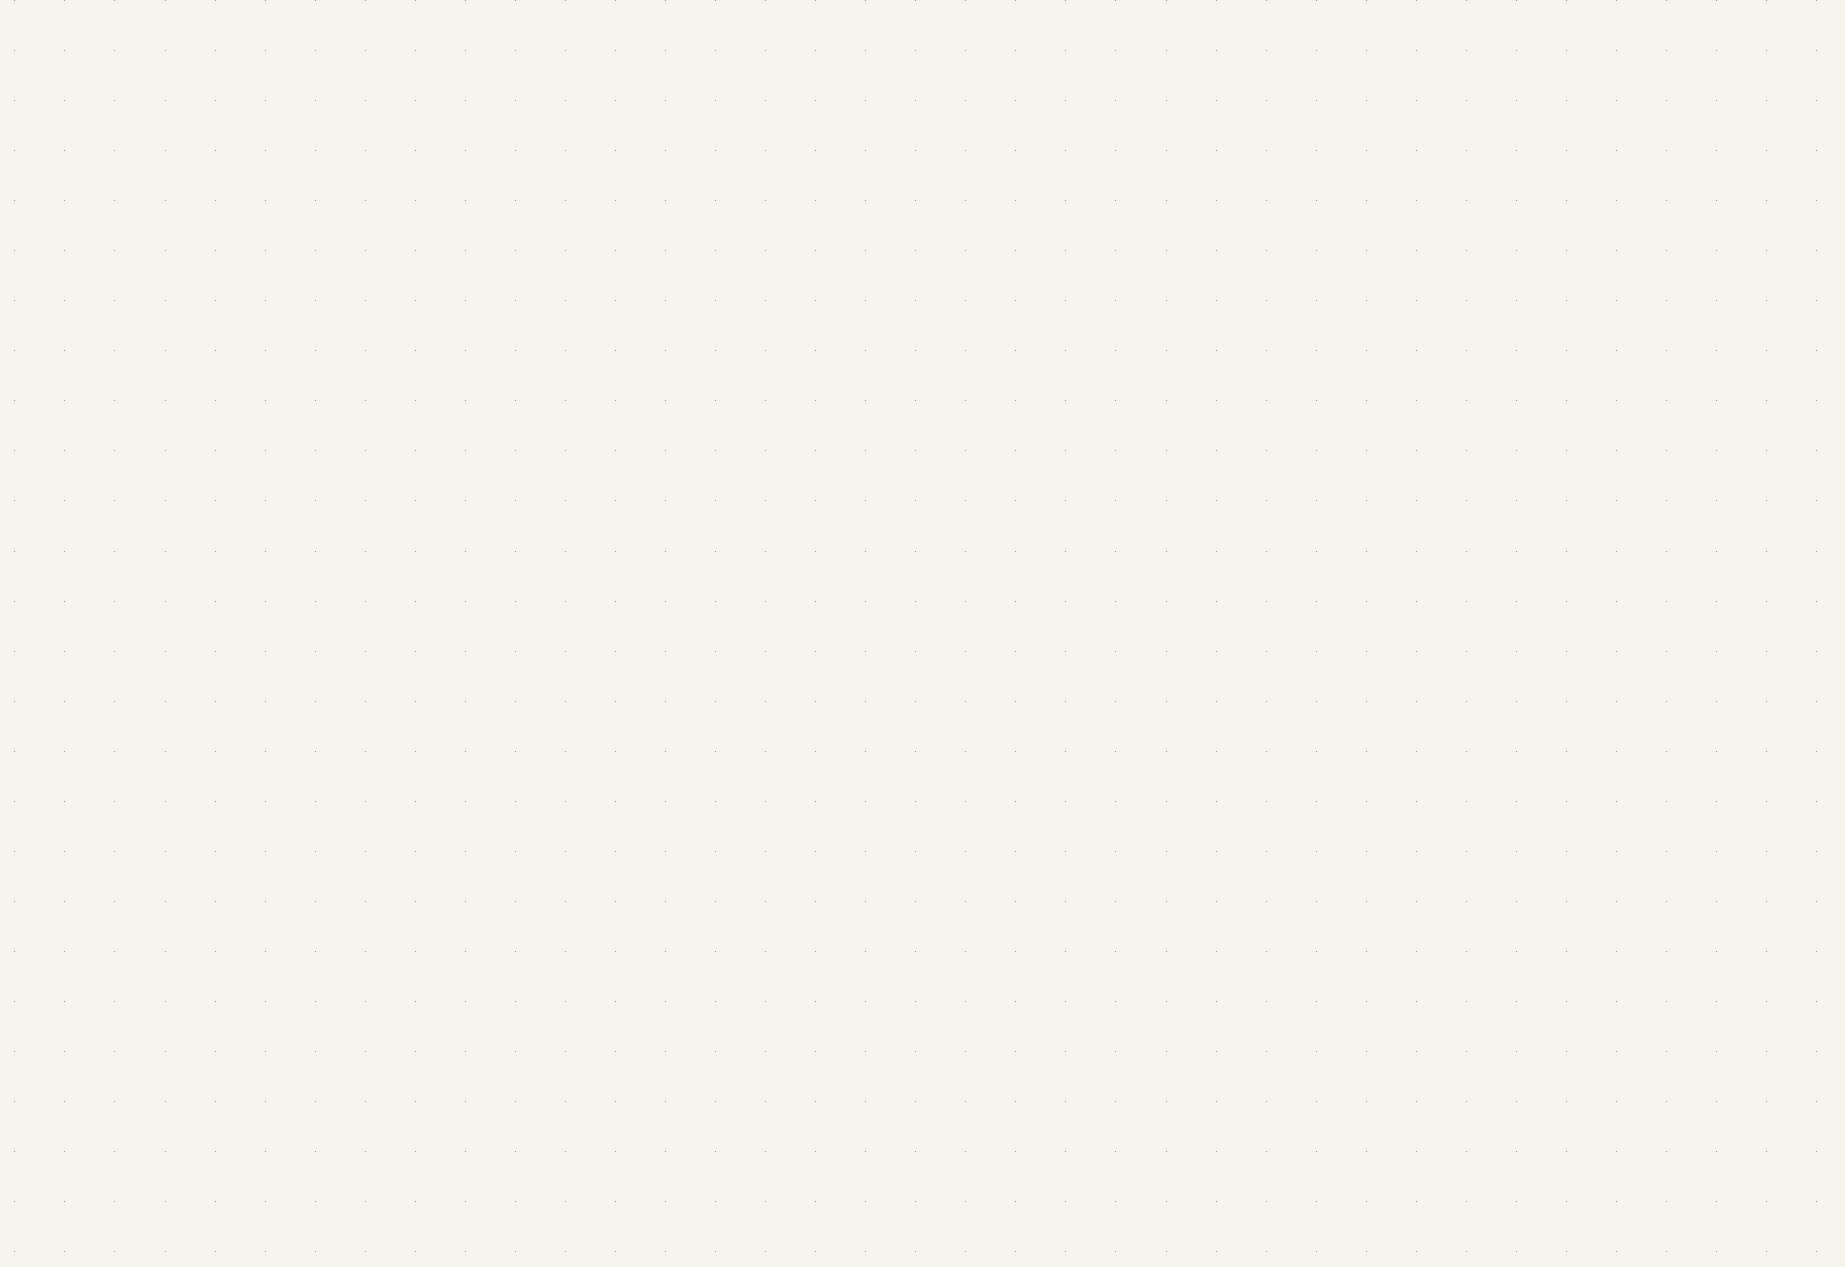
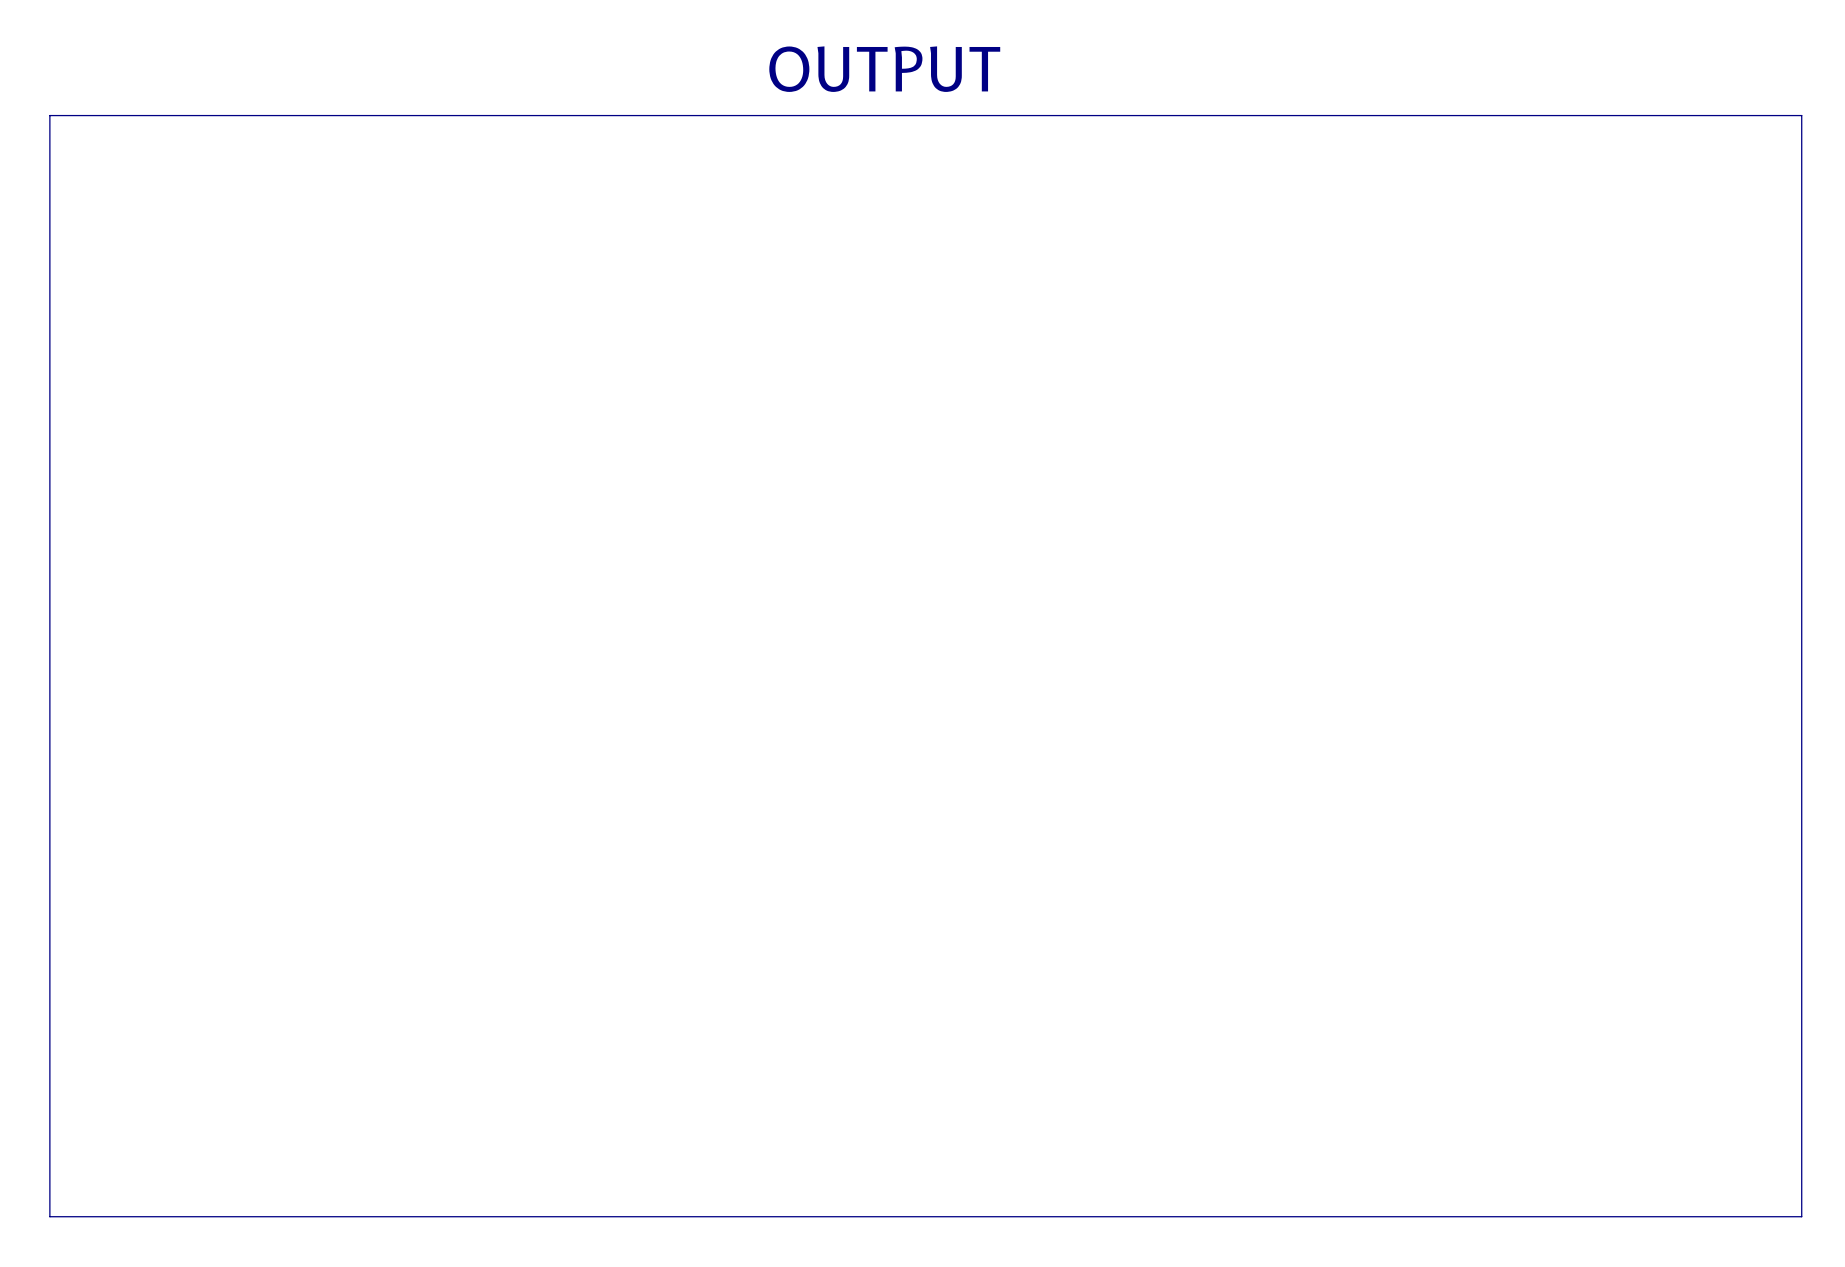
text: none -> OUTPUT (884, 69)
line: none -> (49, 115) (1801, 115) (1801, 1216) (49, 1216) (49, 115)

